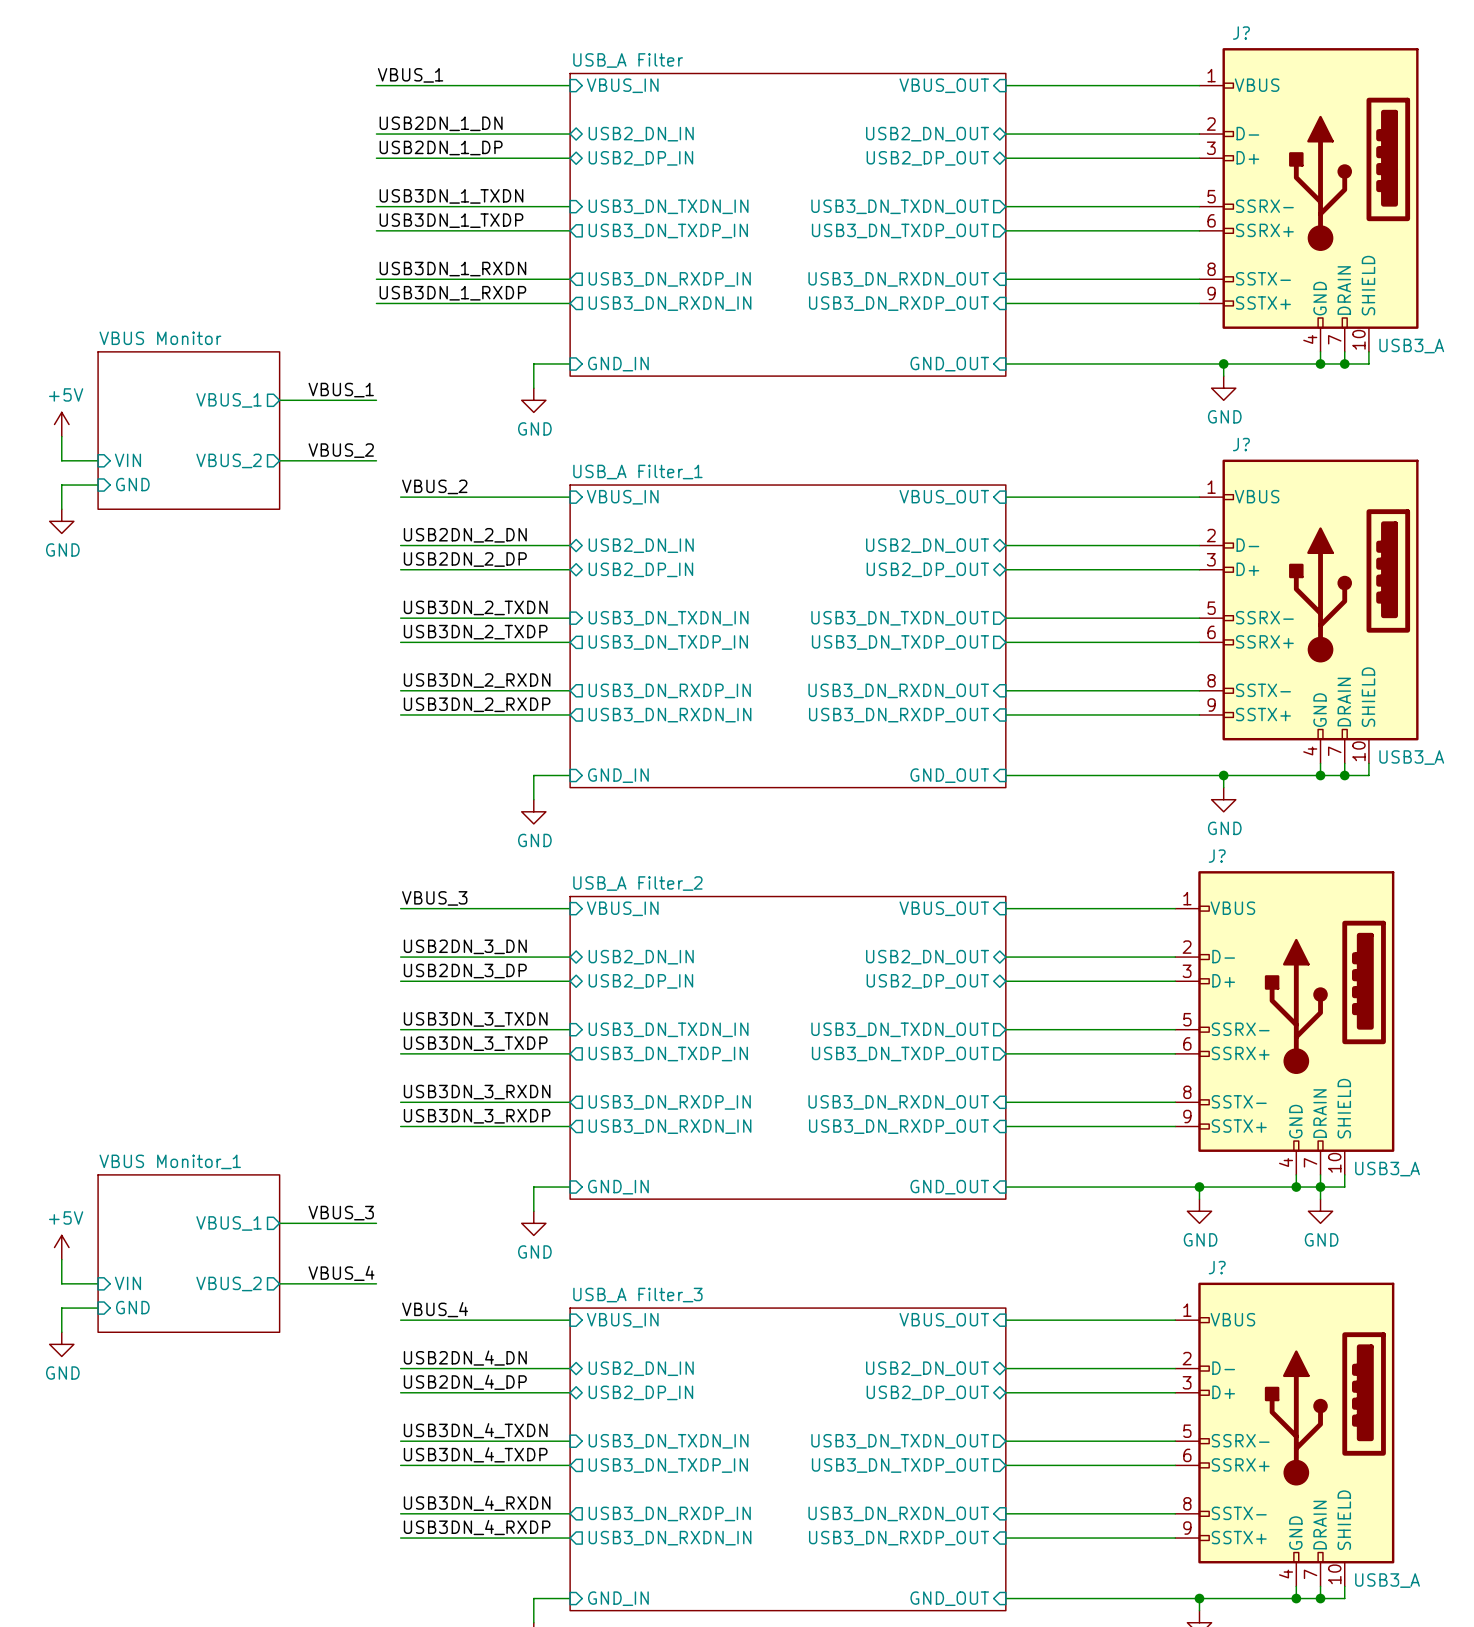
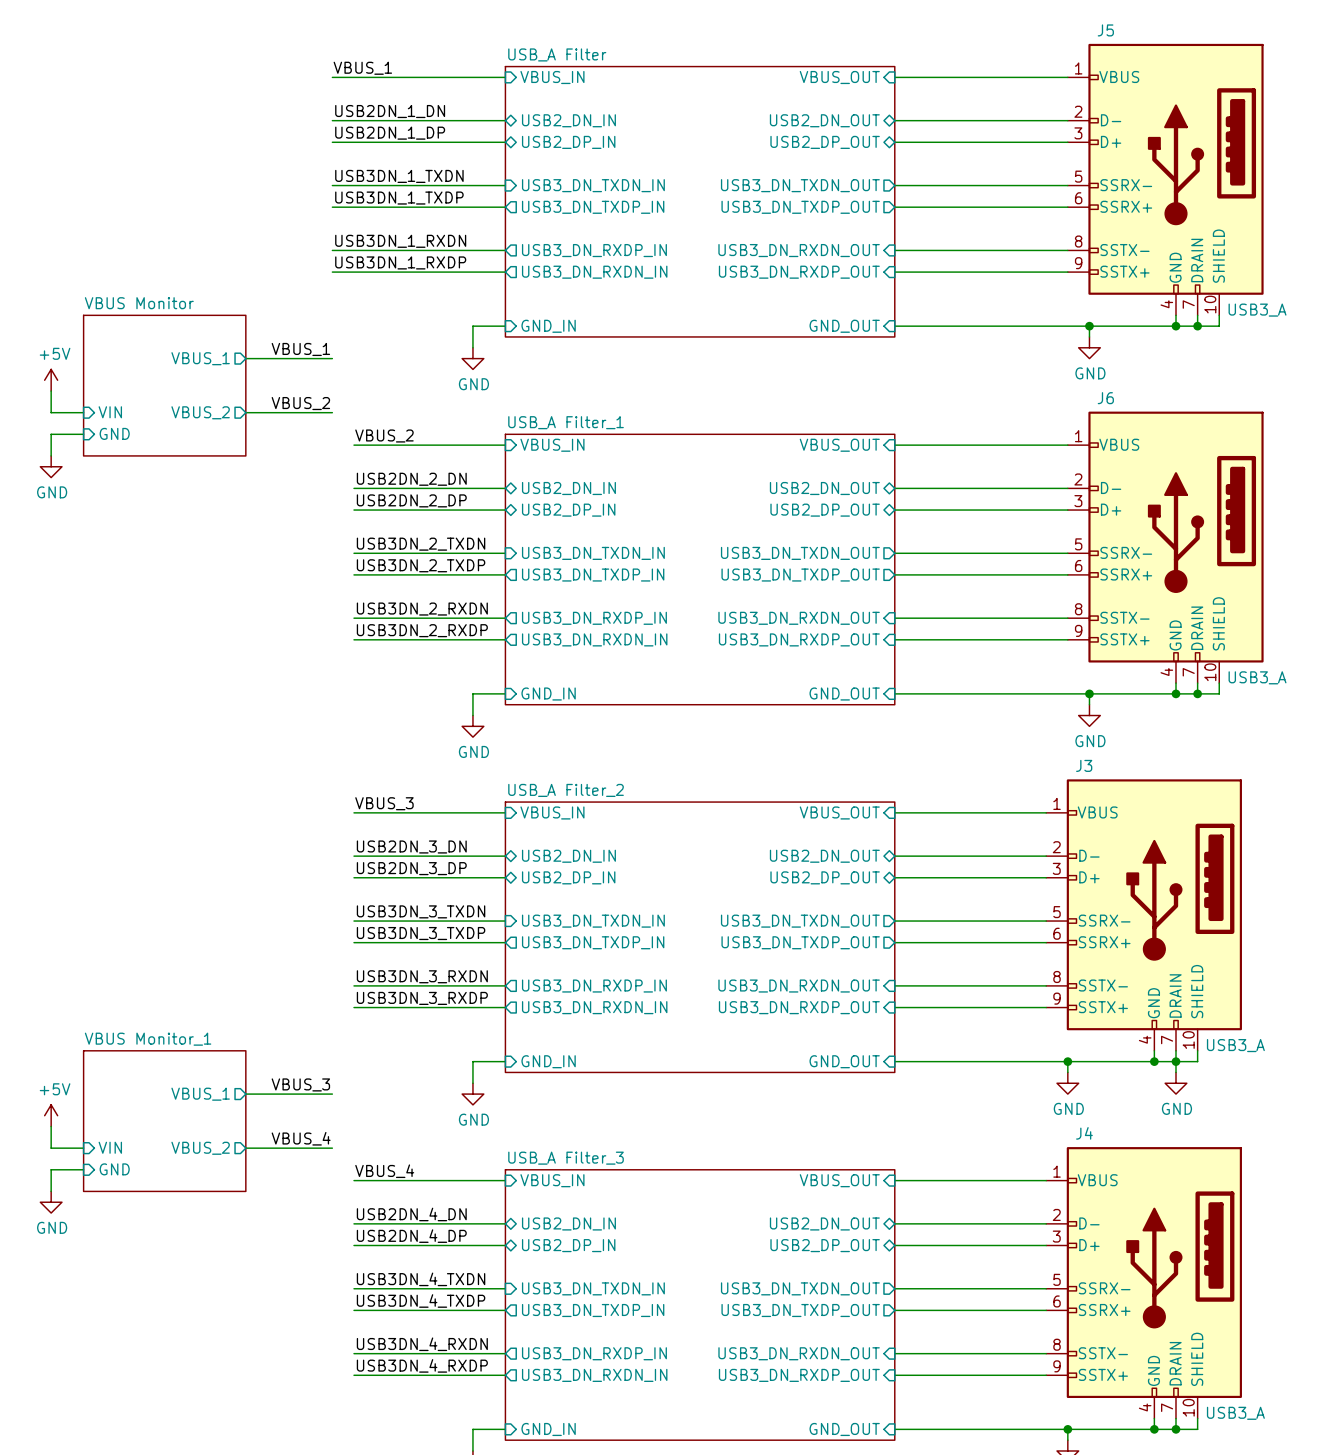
J? name: J? (1241, 33) -> J5 (1105, 30)
J? name: J? (1241, 444) -> J6 (1105, 398)
J? name: J? (1217, 856) -> J3 (1084, 765)
J? name: J? (1217, 1267) -> J4 (1084, 1133)

